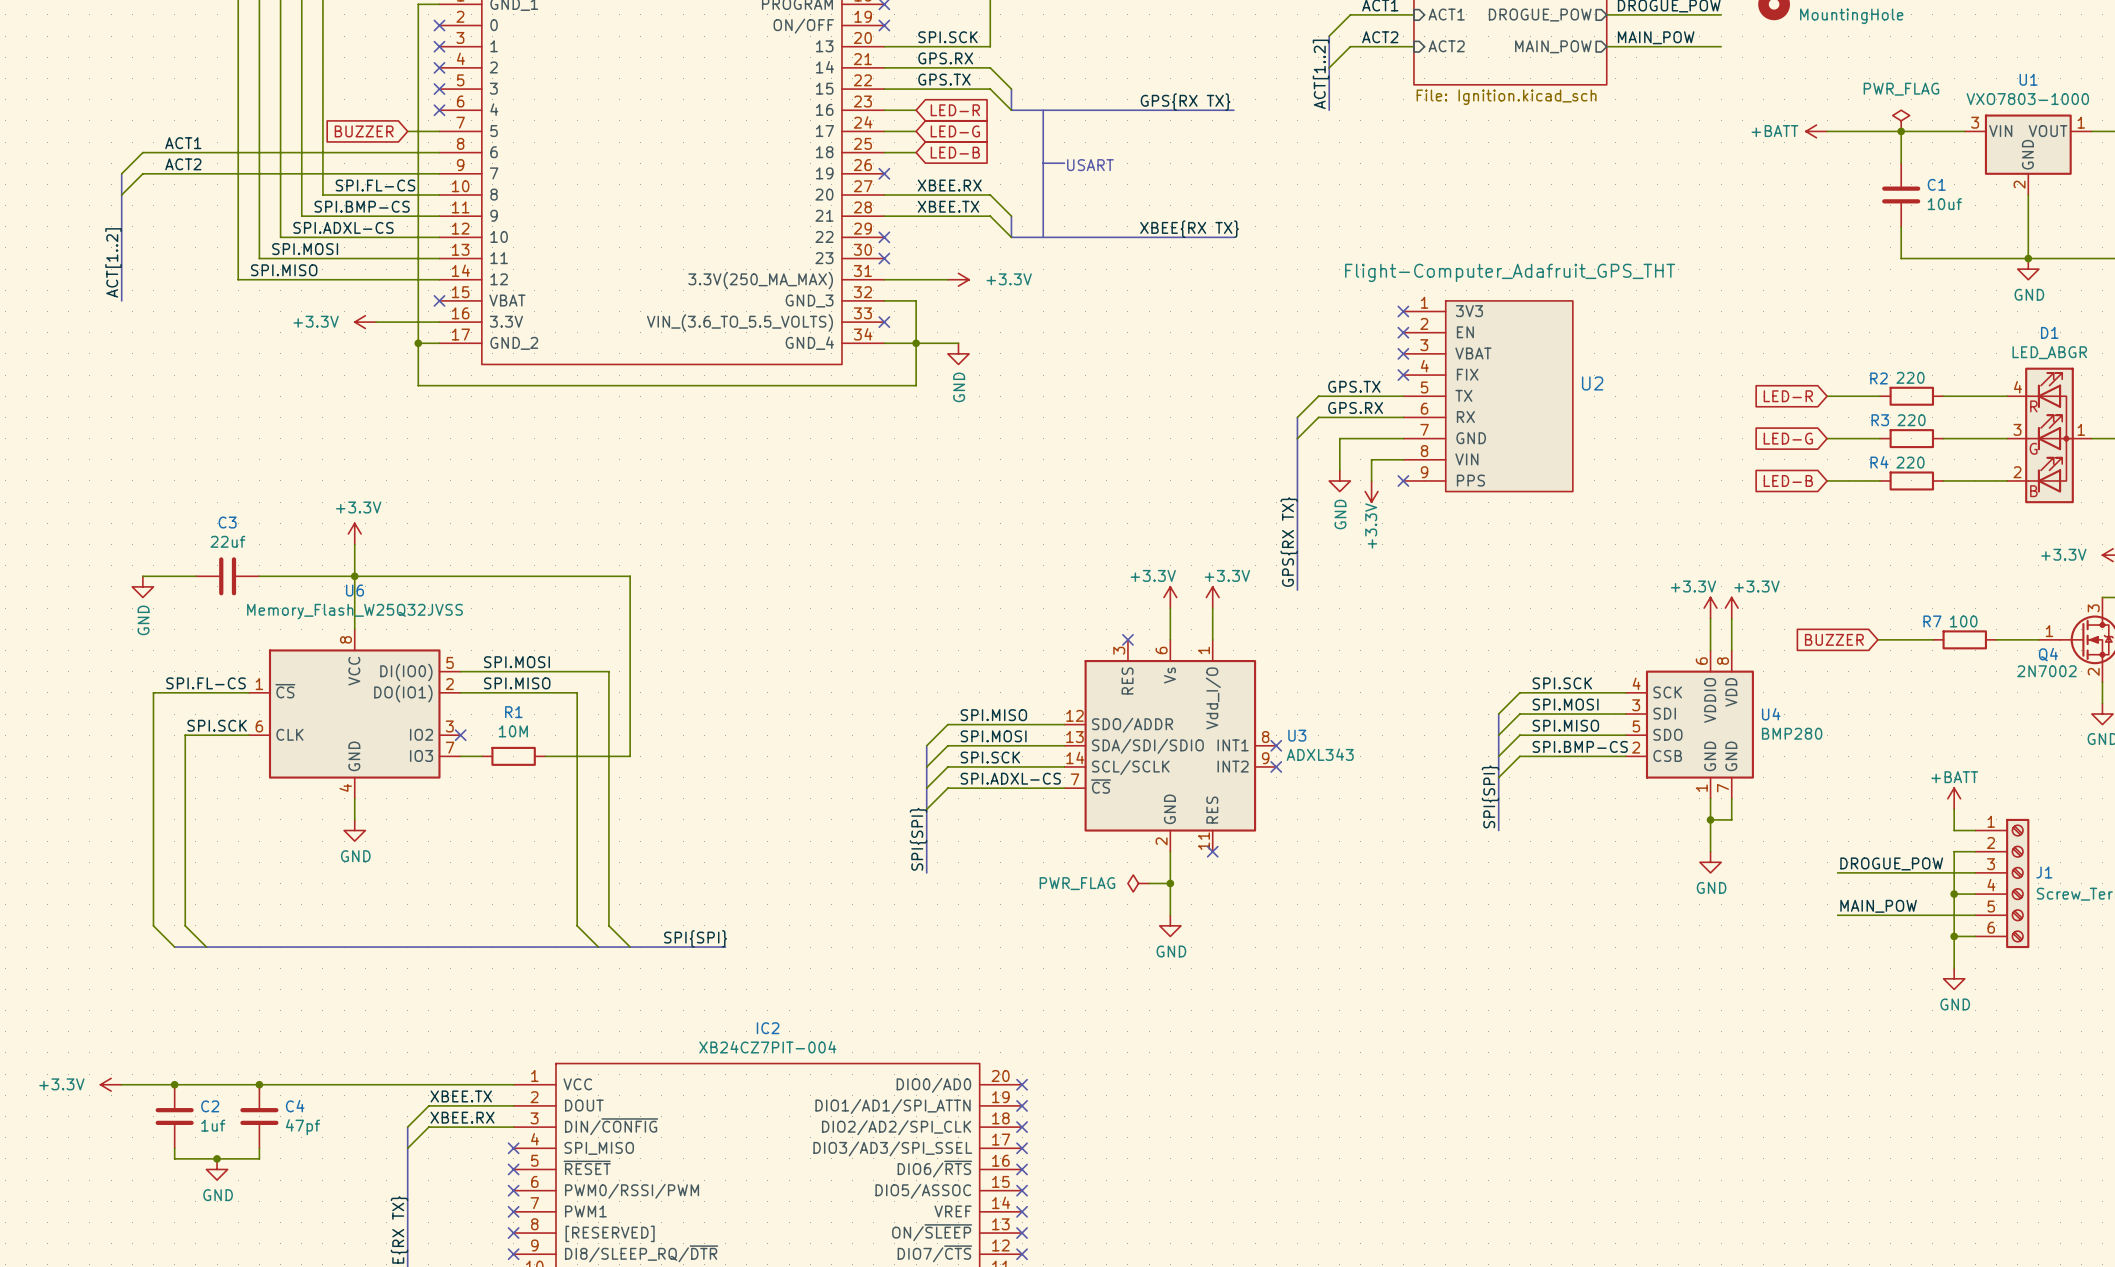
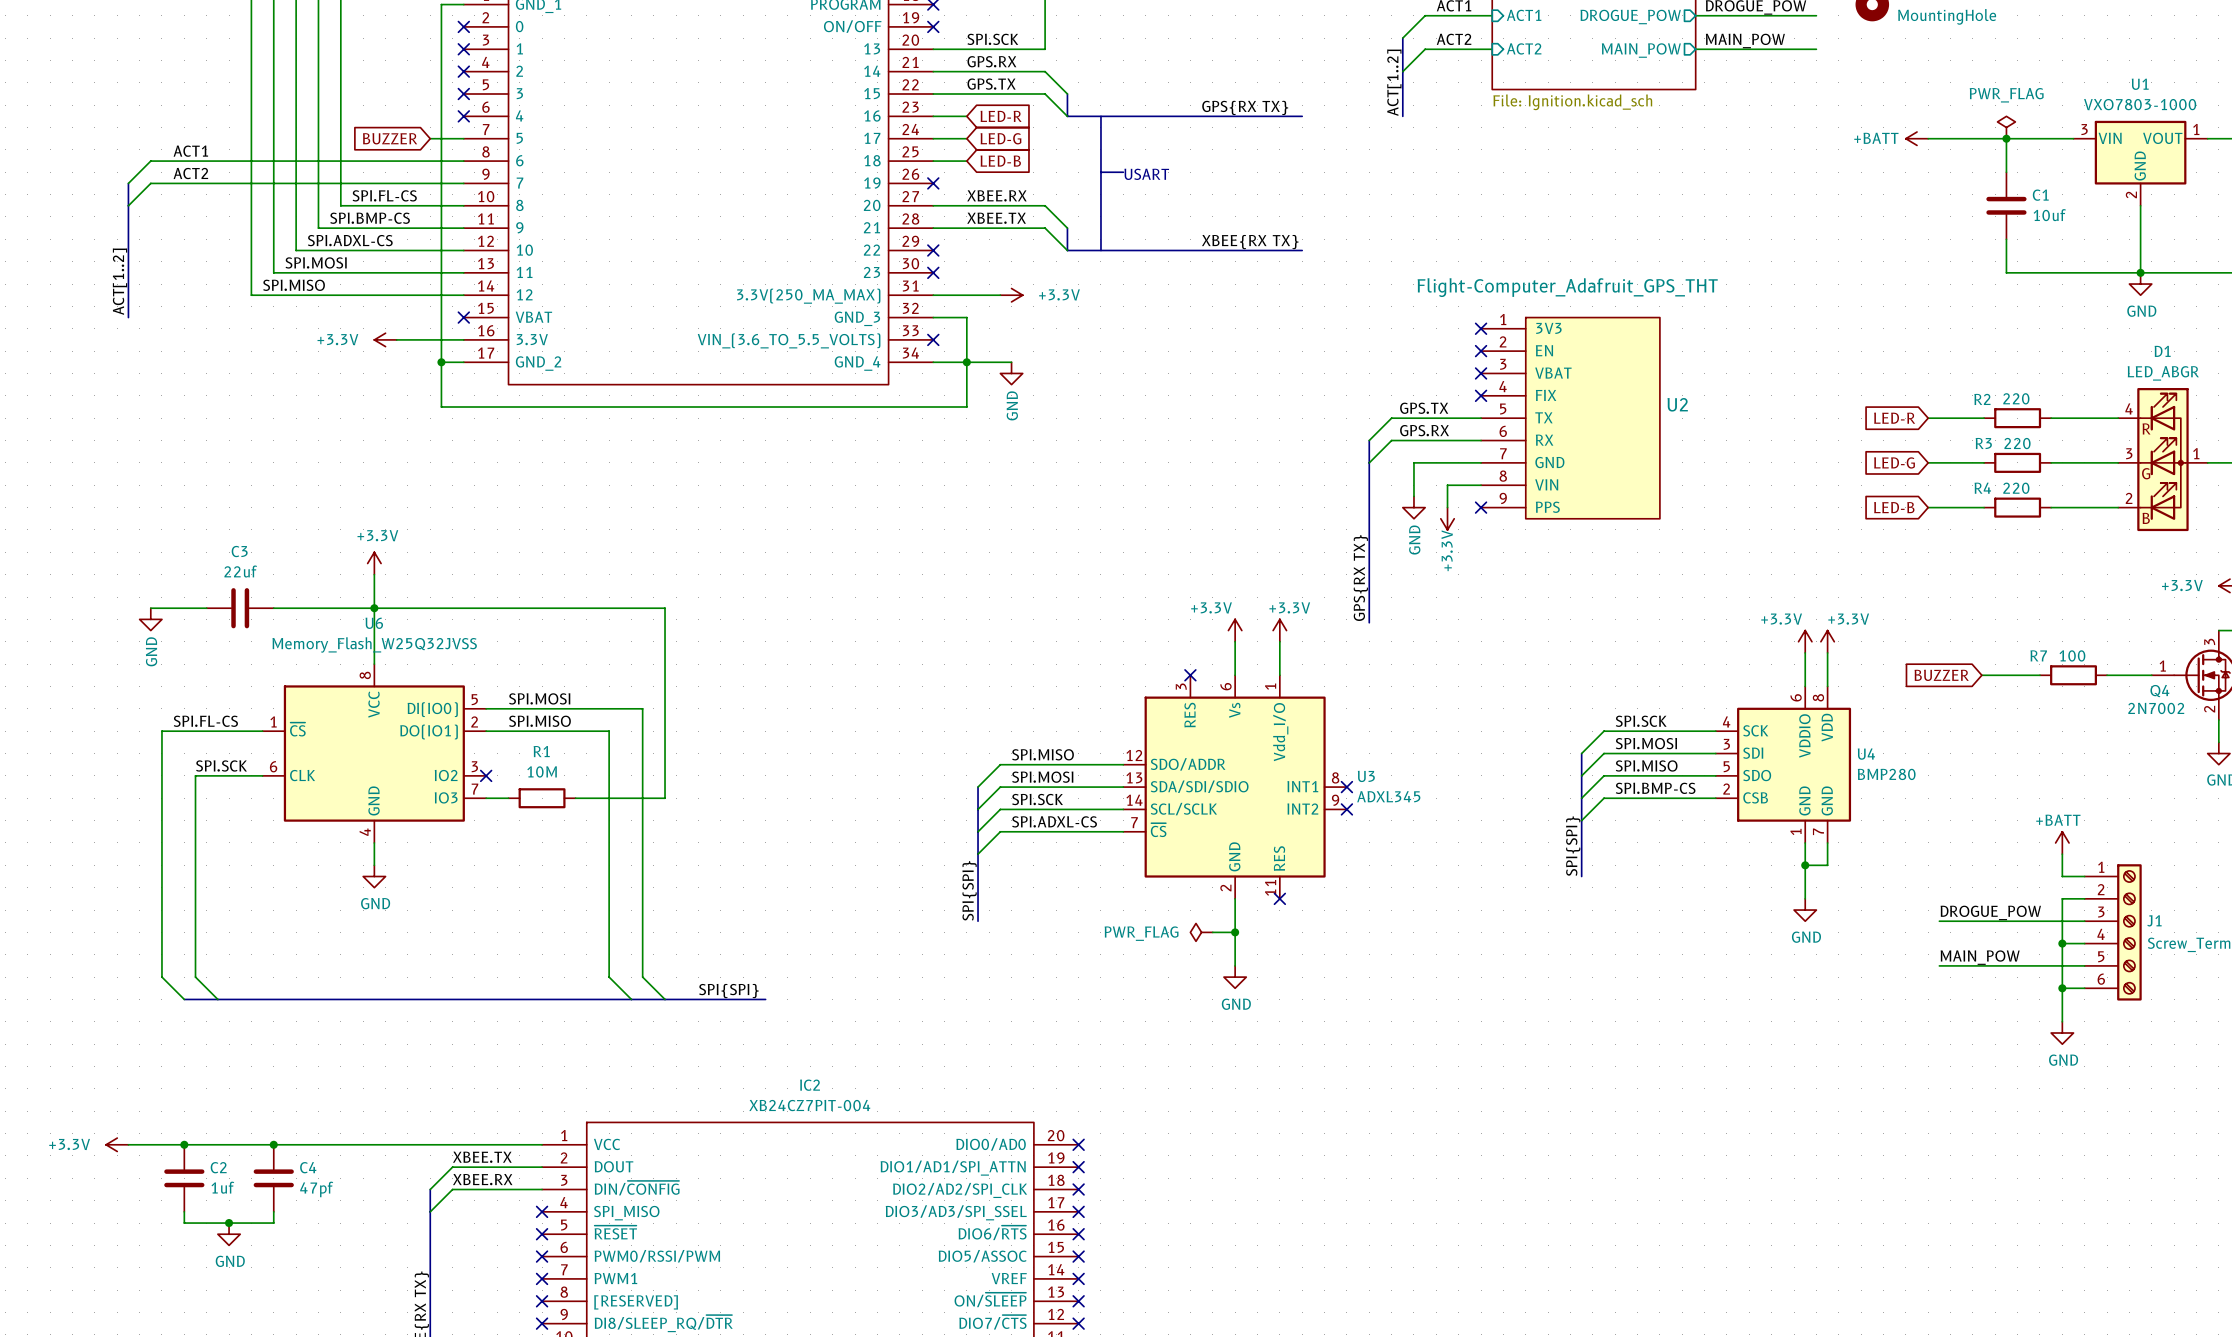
U3 value: ADXL343 (1320, 754) -> ADXL345 (1388, 796)

